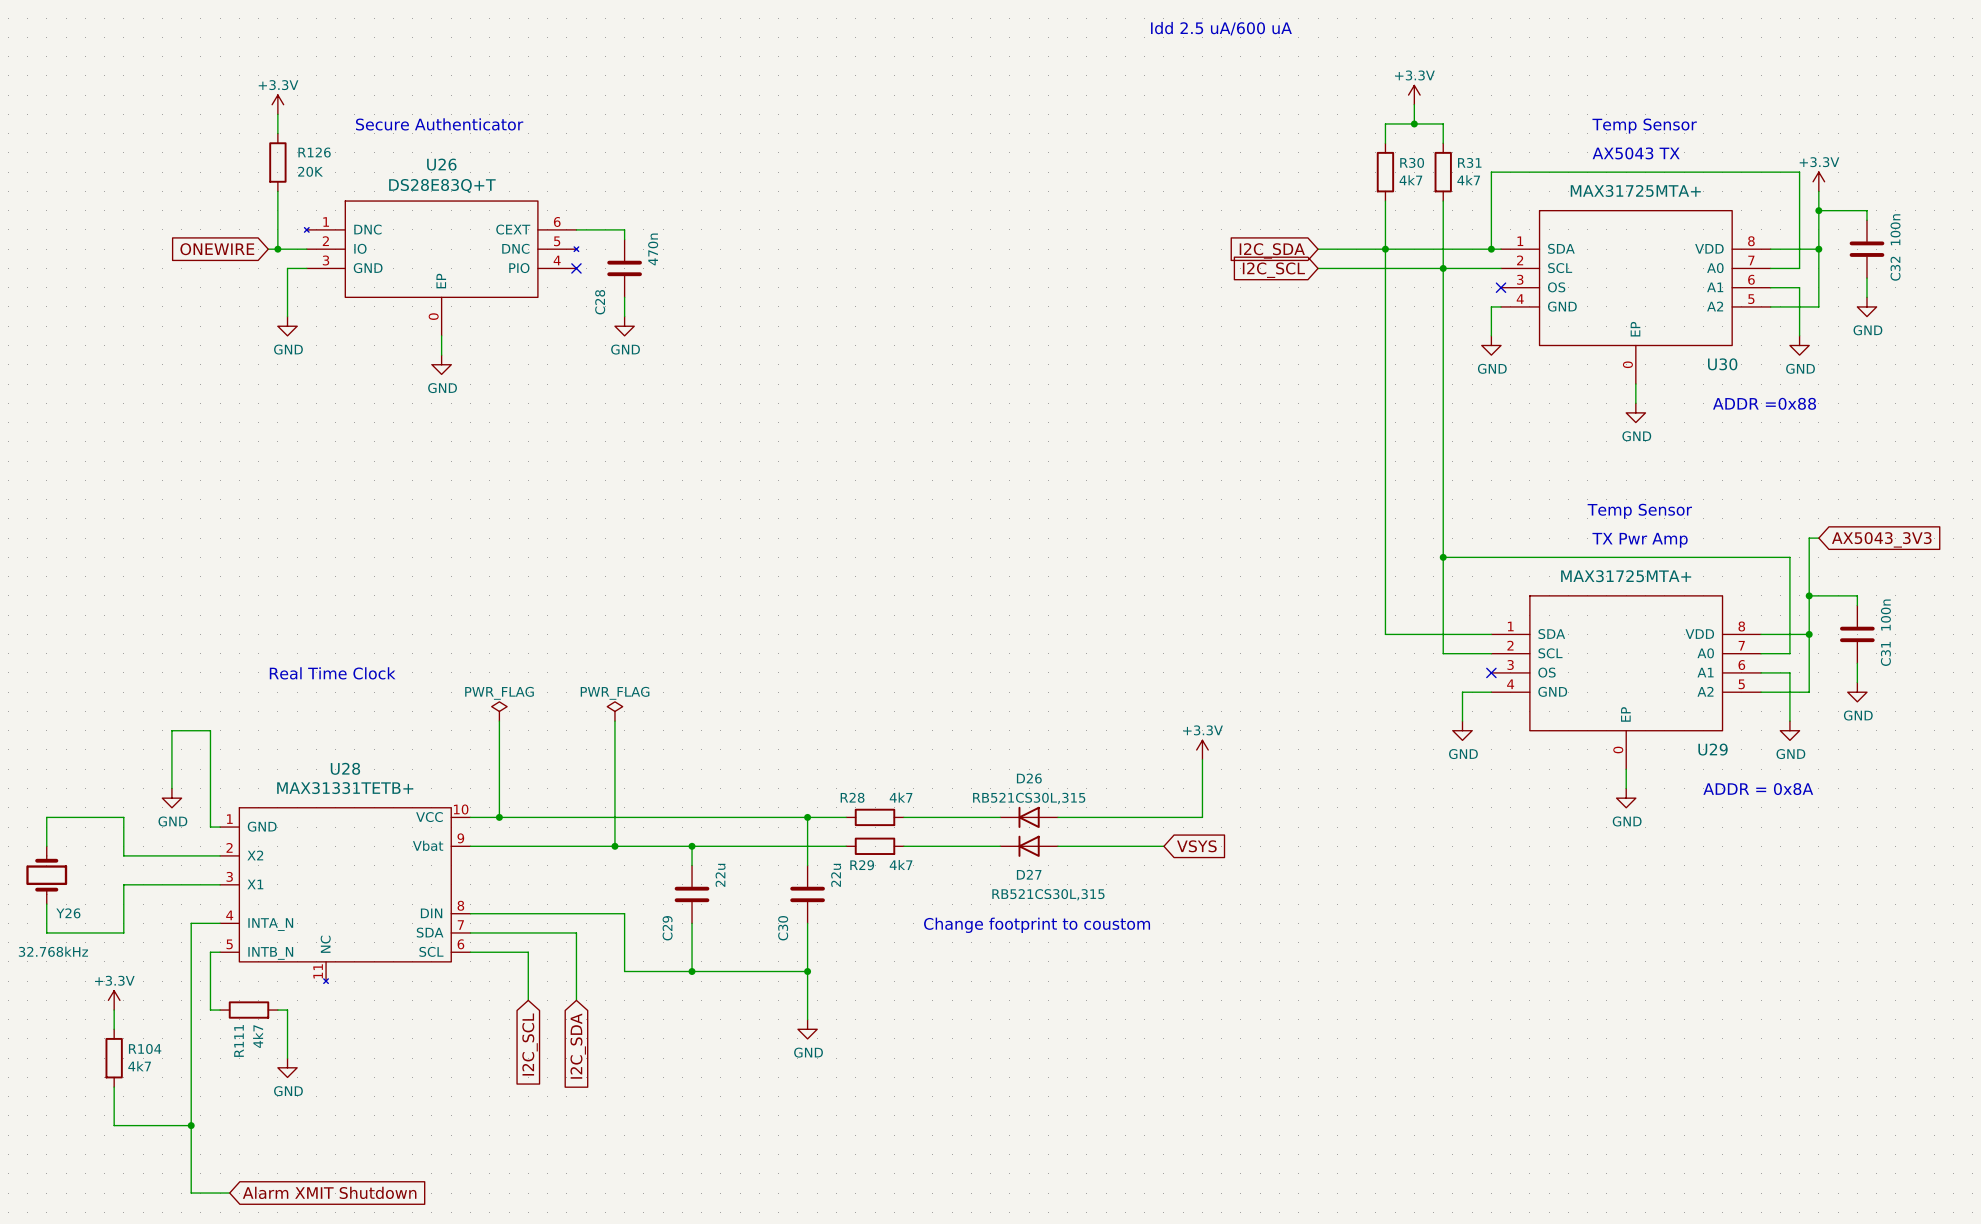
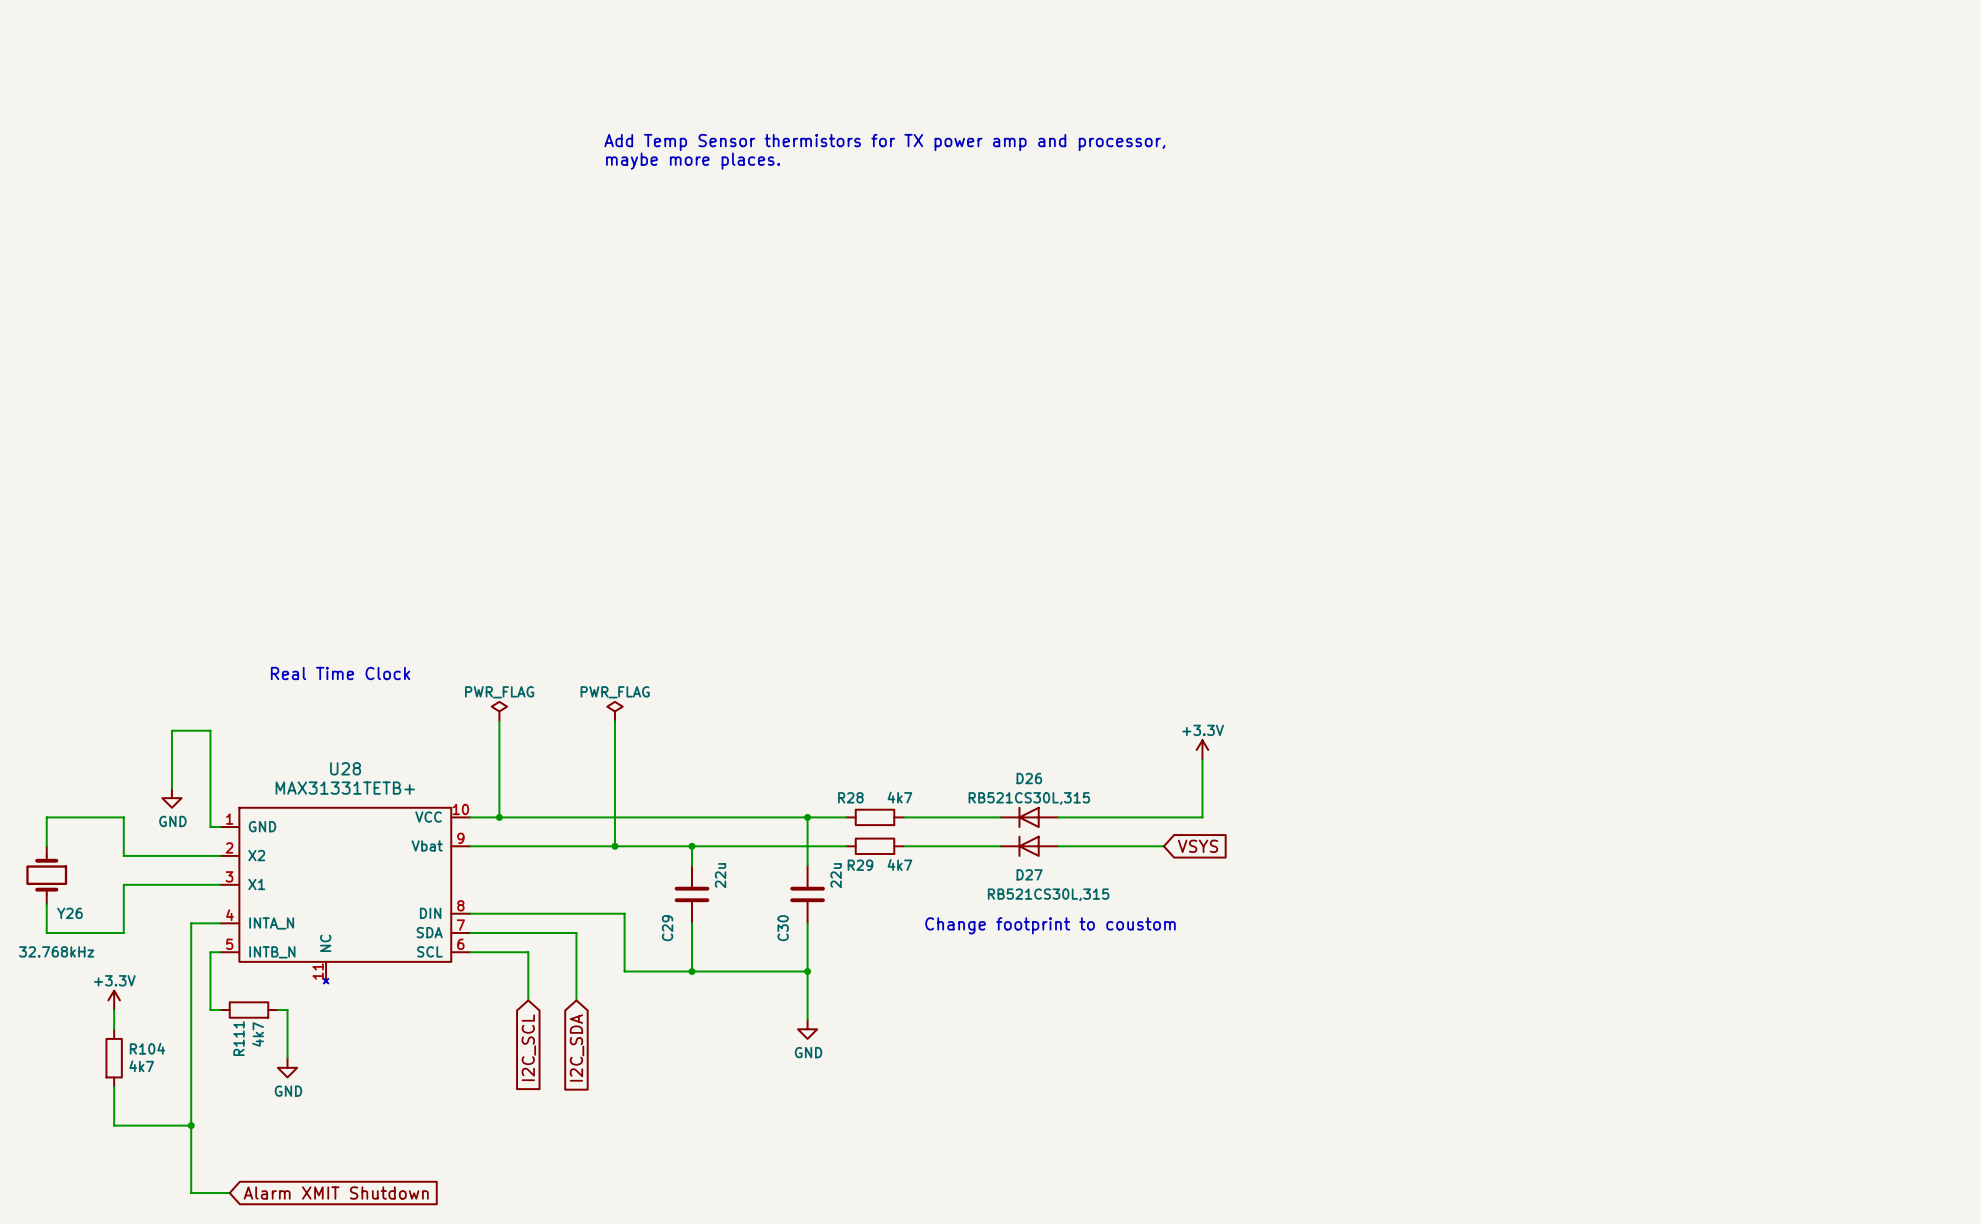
text: Idd 2.5 uA/600 uA (1221, 28) -> none
power symbol: +3.3V (1414, 95) -> none
power symbol: +3.3V (277, 104) -> none
wire: (1414, 104) (1414, 123) -> none
wire: (277, 114) (277, 133) -> none
junction: (1414, 123) -> none
text: Secure Authenticator (439, 124) -> none
text: Temp Sensor (1644, 126) -> none
text: none -> Add Temp Sensor thermistors for TX power amp and processor, (884, 142)
wire: (1385, 143) (1385, 123) (1443, 123) (1443, 143) -> none
text: AX5043 TX (1636, 153) -> none
text: none -> maybe more places. (693, 161)
R126: 20K (277, 162) -> none
R30: 4k7 (1385, 172) -> none
R31: 4k7 (1443, 172) -> none
power symbol: +3.3V (1818, 181) -> none
wire: (277, 191) (277, 249) -> none
wire: (1818, 191) (1818, 306) (1770, 306) -> none
wire: (1385, 201) (1385, 634) (1491, 634) -> none
wire: (1443, 201) (1443, 653) (1491, 653) -> none
wire: (1818, 210) (1866, 210) (1866, 220) -> none
junction: (1818, 210) -> none
wire: (576, 229) (624, 229) (624, 239) -> none
global label: ONEWIRE (217, 249) -> none
wire: (268, 249) (306, 249) -> none
junction: (277, 249) -> none
wire: (1318, 249) (1501, 249) -> none
junction: (1385, 249) -> none
wire: (1491, 249) (1491, 172) (1799, 172) (1799, 268) (1770, 268) -> none
junction: (1491, 249) -> none
wire: (1770, 249) (1818, 249) -> none
junction: (1818, 249) -> none
C32: 100n (1866, 249) -> none
global label: I2C_SDA (1272, 250) -> none
wire: (306, 268) (287, 268) (287, 316) -> none
U26: DS28E83Q+T (441, 268) -> none
no-connect mark: (576, 268) -> none
C28: 470n (624, 268) -> none
wire: (1318, 268) (1501, 268) -> none
junction: (1443, 268) -> none
global label: I2C_SCL (1273, 270) -> none
wire: (1866, 278) (1866, 297) -> none
no-connect mark: (1501, 287) -> none
wire: (1770, 287) (1799, 287) (1799, 335) -> none
wire: (624, 297) (624, 316) -> none
U30: MAX31725MTA+ (1635, 297) -> none
wire: (1501, 306) (1491, 306) (1491, 335) -> none
power symbol: GND (1866, 306) -> none
power symbol: GND (287, 326) -> none
power symbol: GND (624, 326) -> none
wire: (441, 335) (441, 355) -> none
power symbol: GND (1491, 345) -> none
power symbol: GND (1799, 345) -> none
power symbol: GND (441, 364) -> none
wire: (1635, 384) (1635, 403) -> none
text: ADDR =0x88 (1764, 403) -> none
power symbol: GND (1635, 412) -> none
text: Temp Sensor (1639, 511) -> none
wire: (1818, 538) (1809, 538) (1809, 692) (1761, 692) -> none
global label: AX5043_3V3 (1881, 539) -> none
text: TX Pwr Amp (1640, 540) -> none
wire: (1443, 557) (1789, 557) (1789, 653) (1761, 653) -> none
junction: (1443, 557) -> none
wire: (1809, 595) (1857, 595) (1857, 605) -> none
junction: (1809, 595) -> none
wire: (1761, 634) (1809, 634) -> none
junction: (1809, 634) -> none
C31: 100n (1857, 634) -> none
wire: (1857, 663) (1857, 682) -> none
no-connect mark: (1491, 672) -> none
wire: (1761, 672) (1789, 672) (1789, 721) -> none
U29: MAX31725MTA+ (1626, 682) -> none
wire: (1491, 692) (1462, 692) (1462, 721) -> none
power symbol: GND (1857, 692) -> none
power symbol: GND (1462, 730) -> none
power symbol: GND (1789, 730) -> none
wire: (1626, 769) (1626, 788) -> none
text: ADDR = 0x8A (1758, 789) -> none
power symbol: GND (1626, 798) -> none

